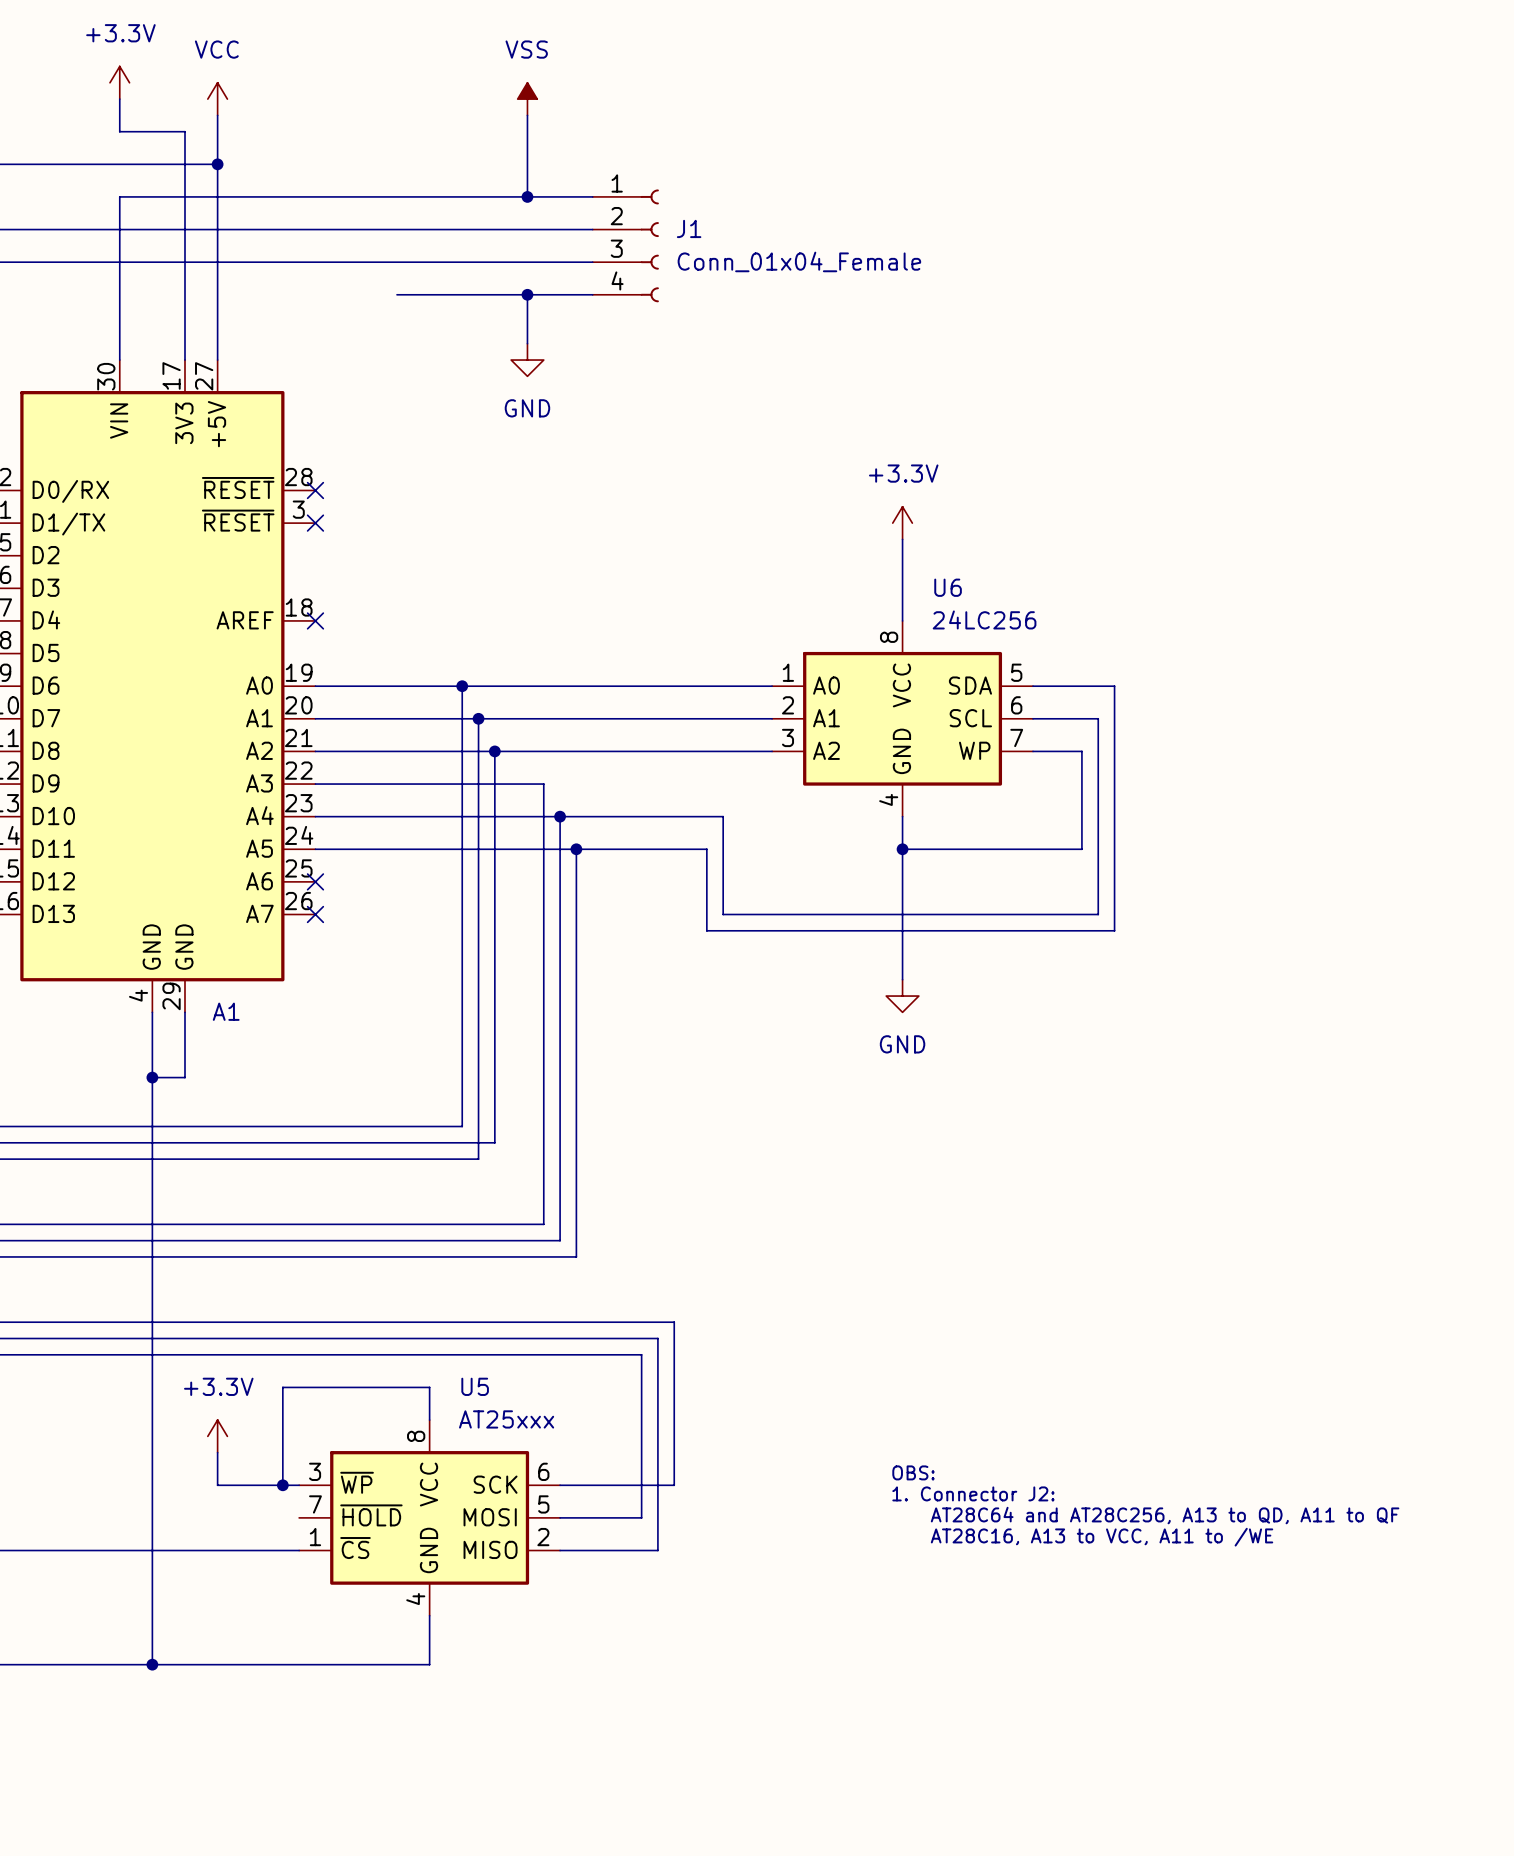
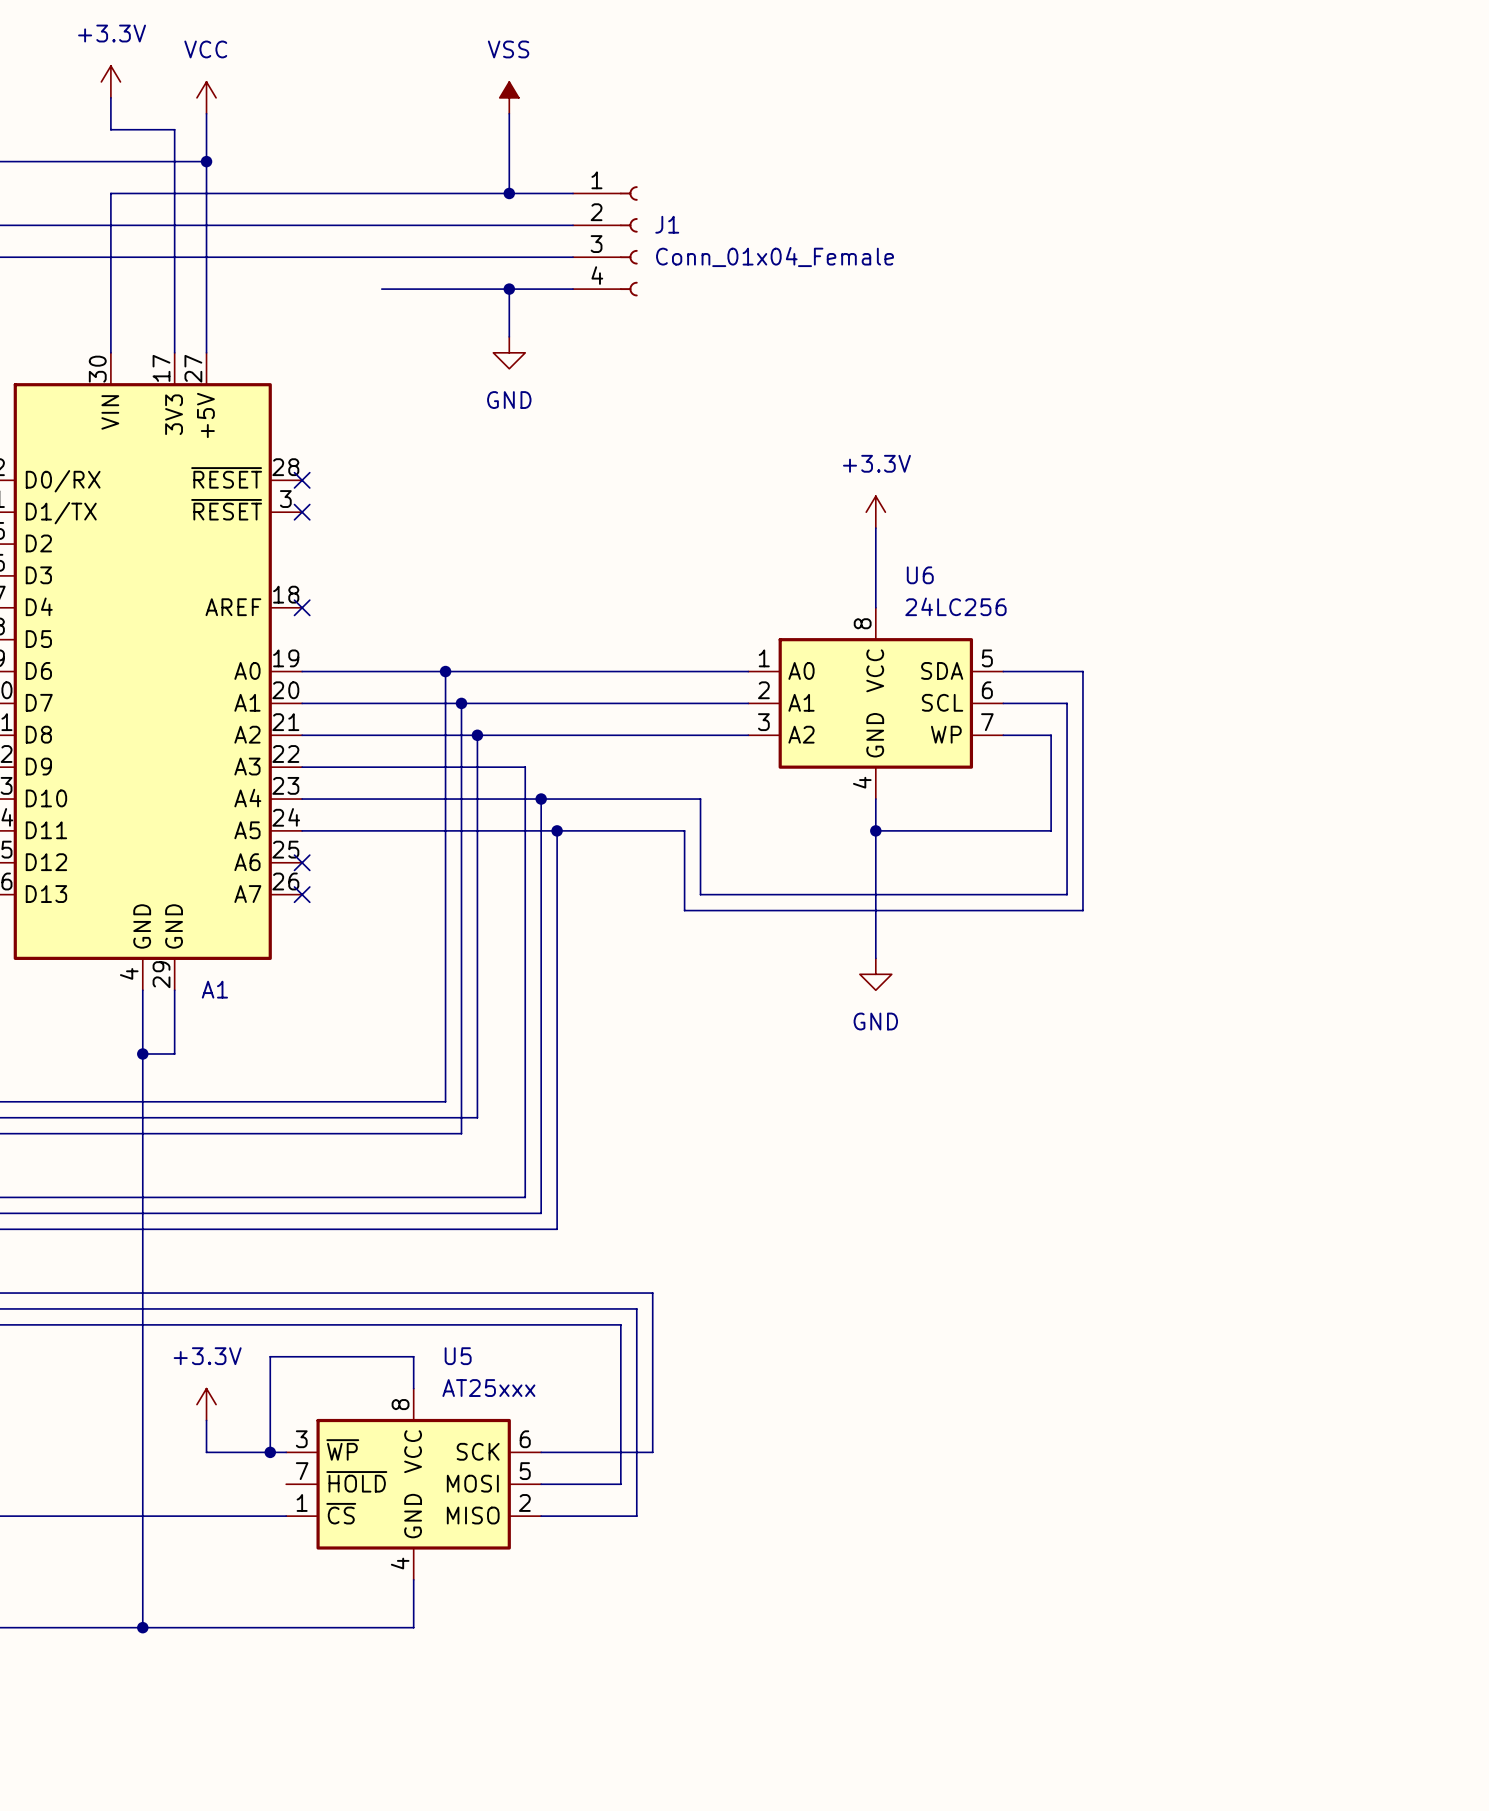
text: OBS: (913, 1472) -> none
text: 1. Connector J2: (973, 1493) -> none
text: AT28C64 and AT28C256, A13 to QD, A11 to QF (1165, 1515) -> none
text: AT28C16, A13 to VCC, A11 to /WE (1102, 1537) -> none

